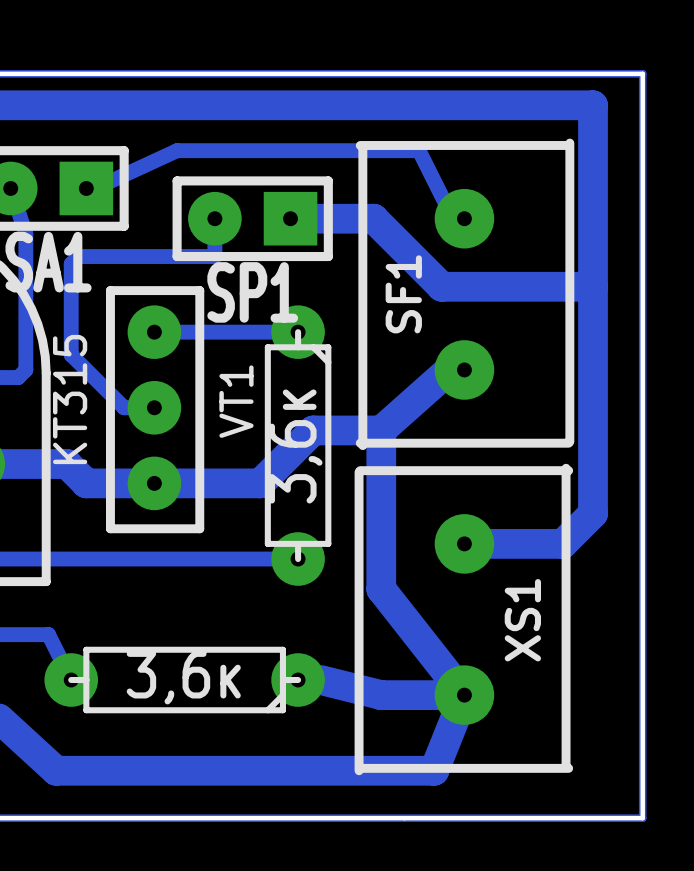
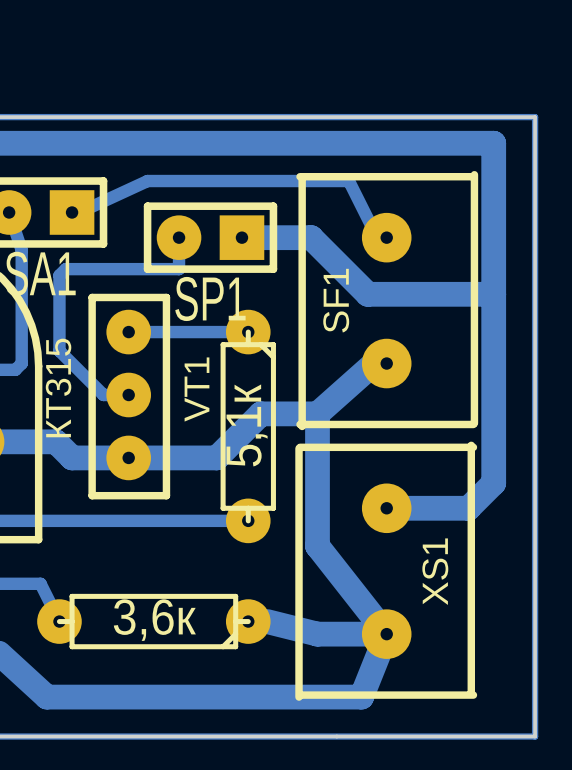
part value: 3,6к (295, 446) -> 5,1к (247, 425)

